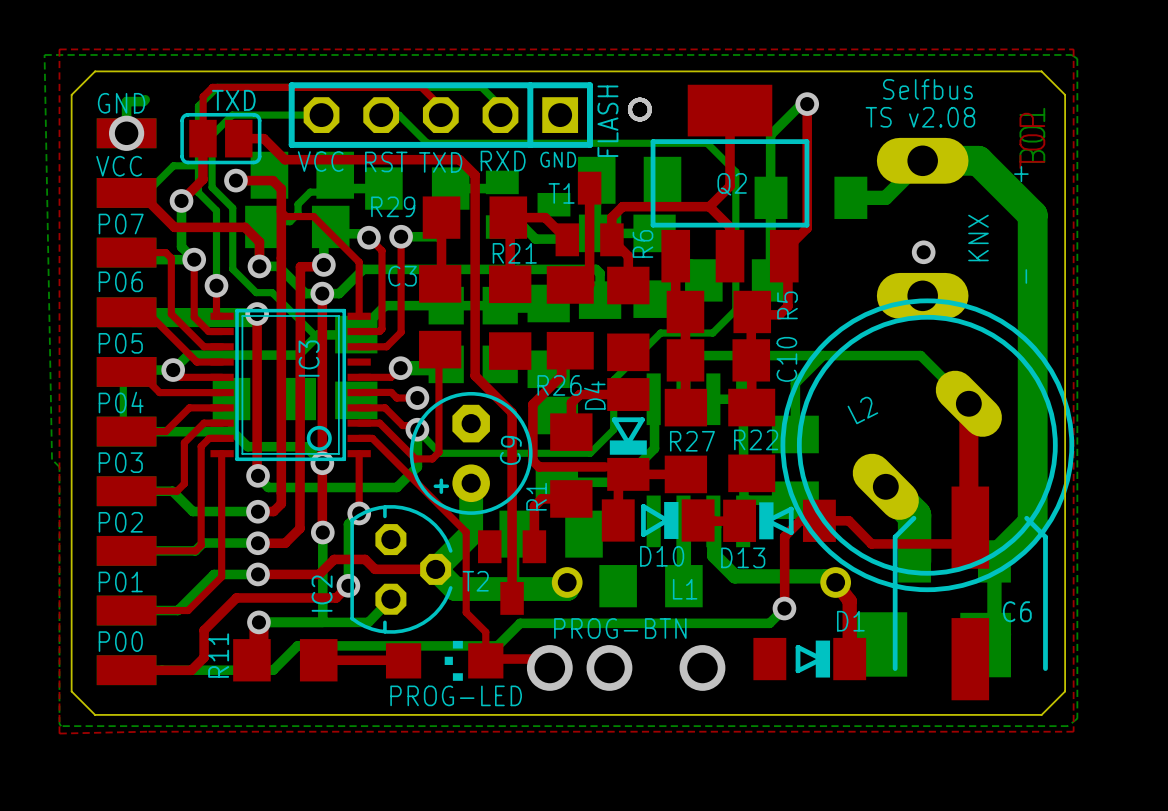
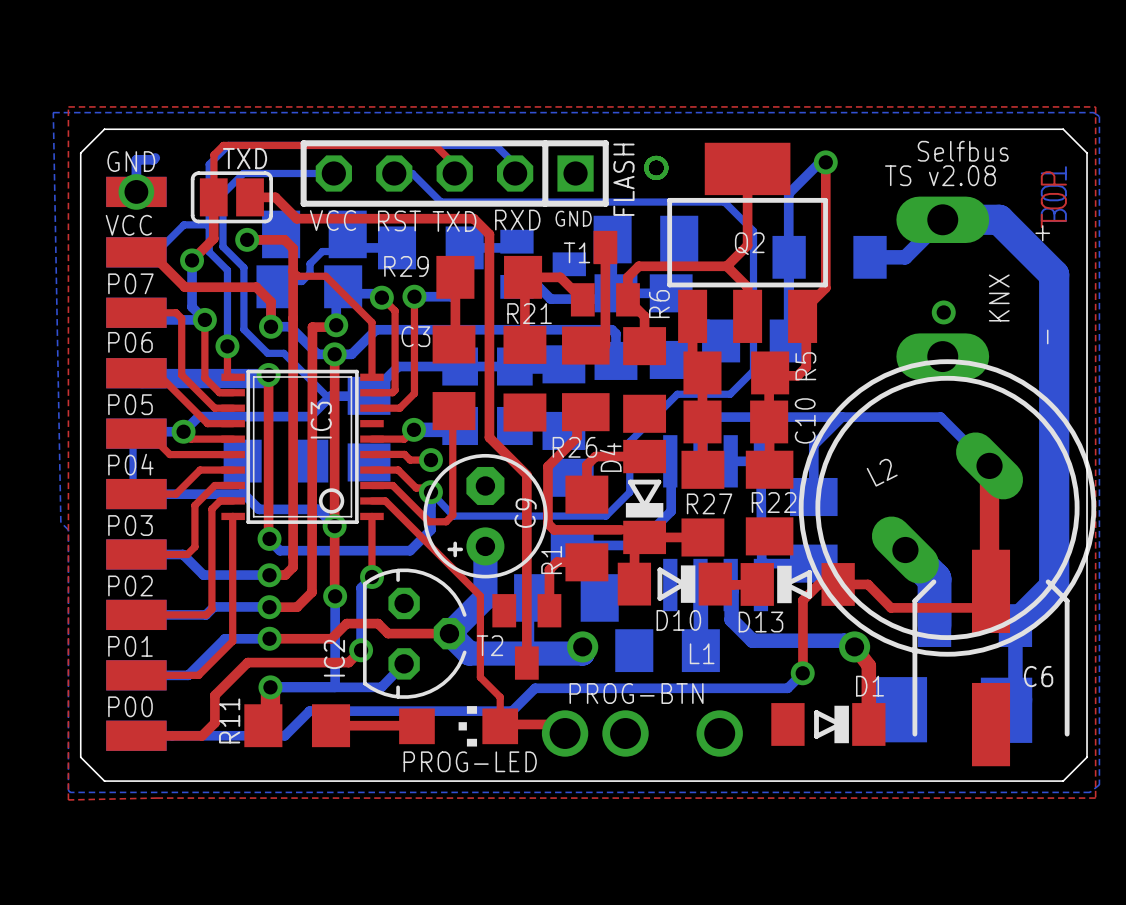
text position: Selfbus (927, 89) -> Selfbus (963, 151)

